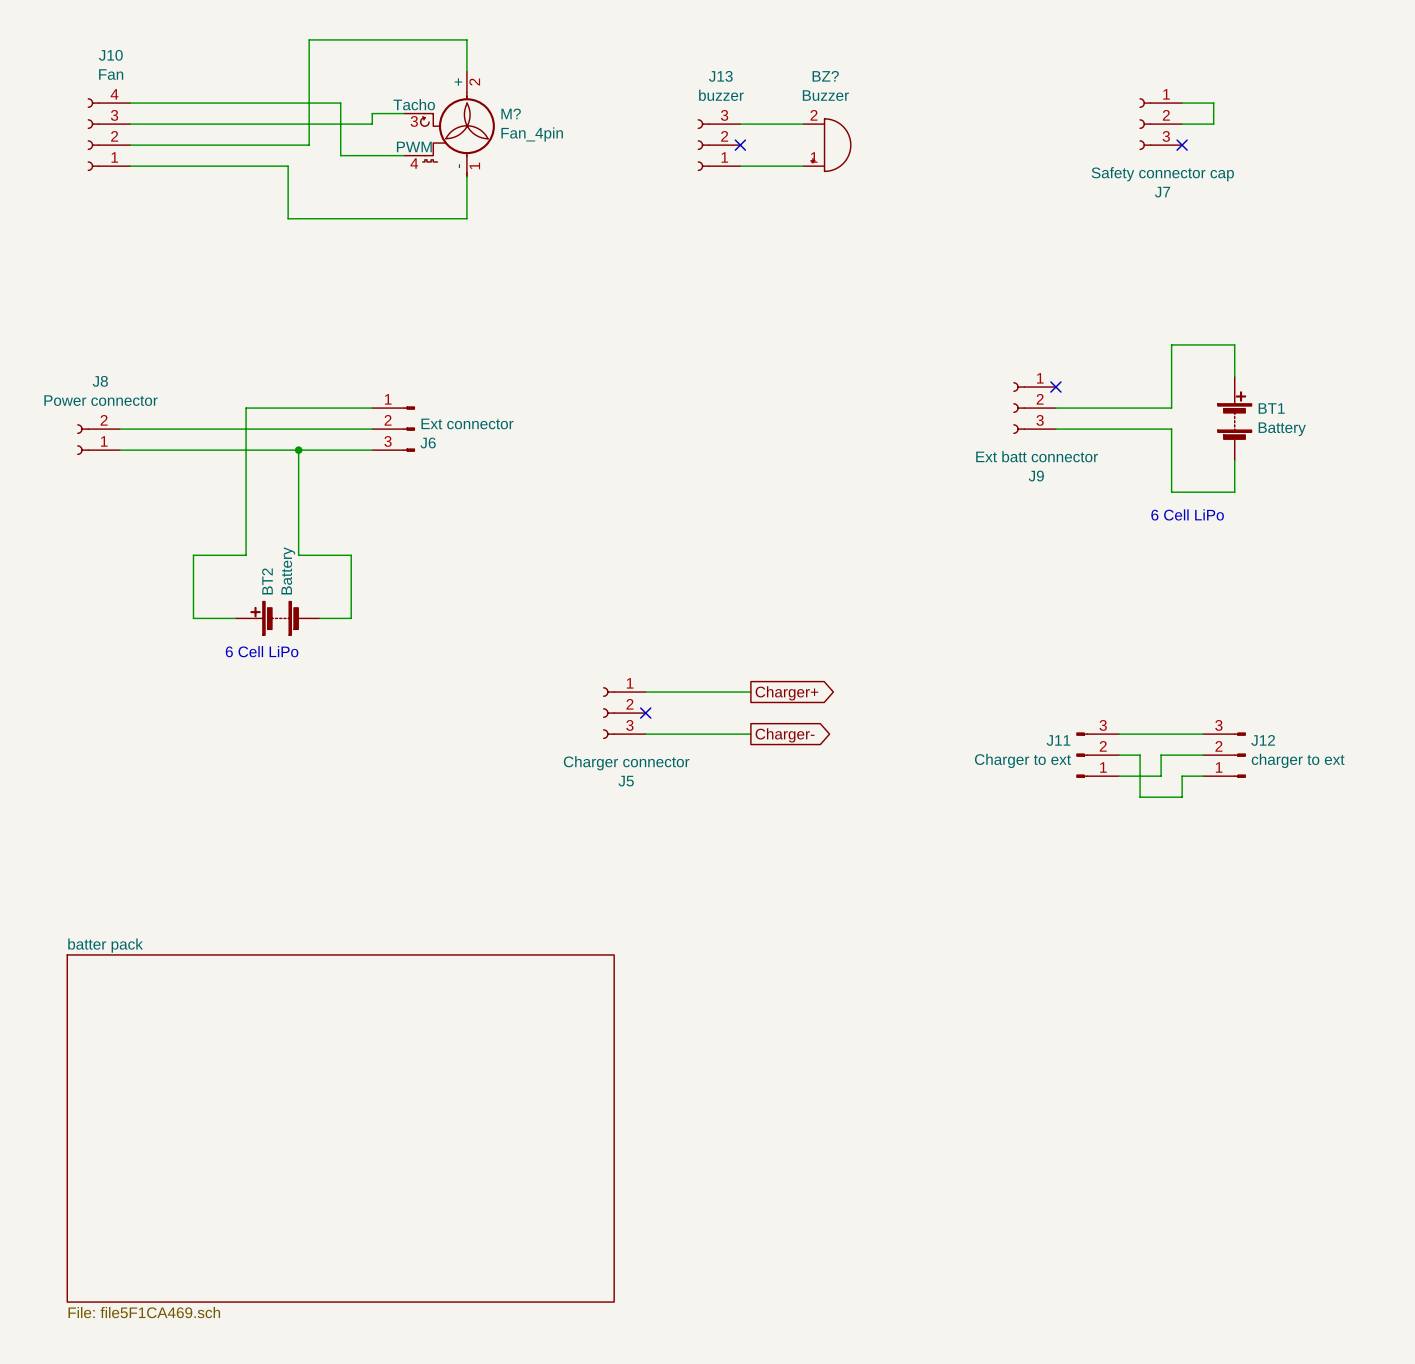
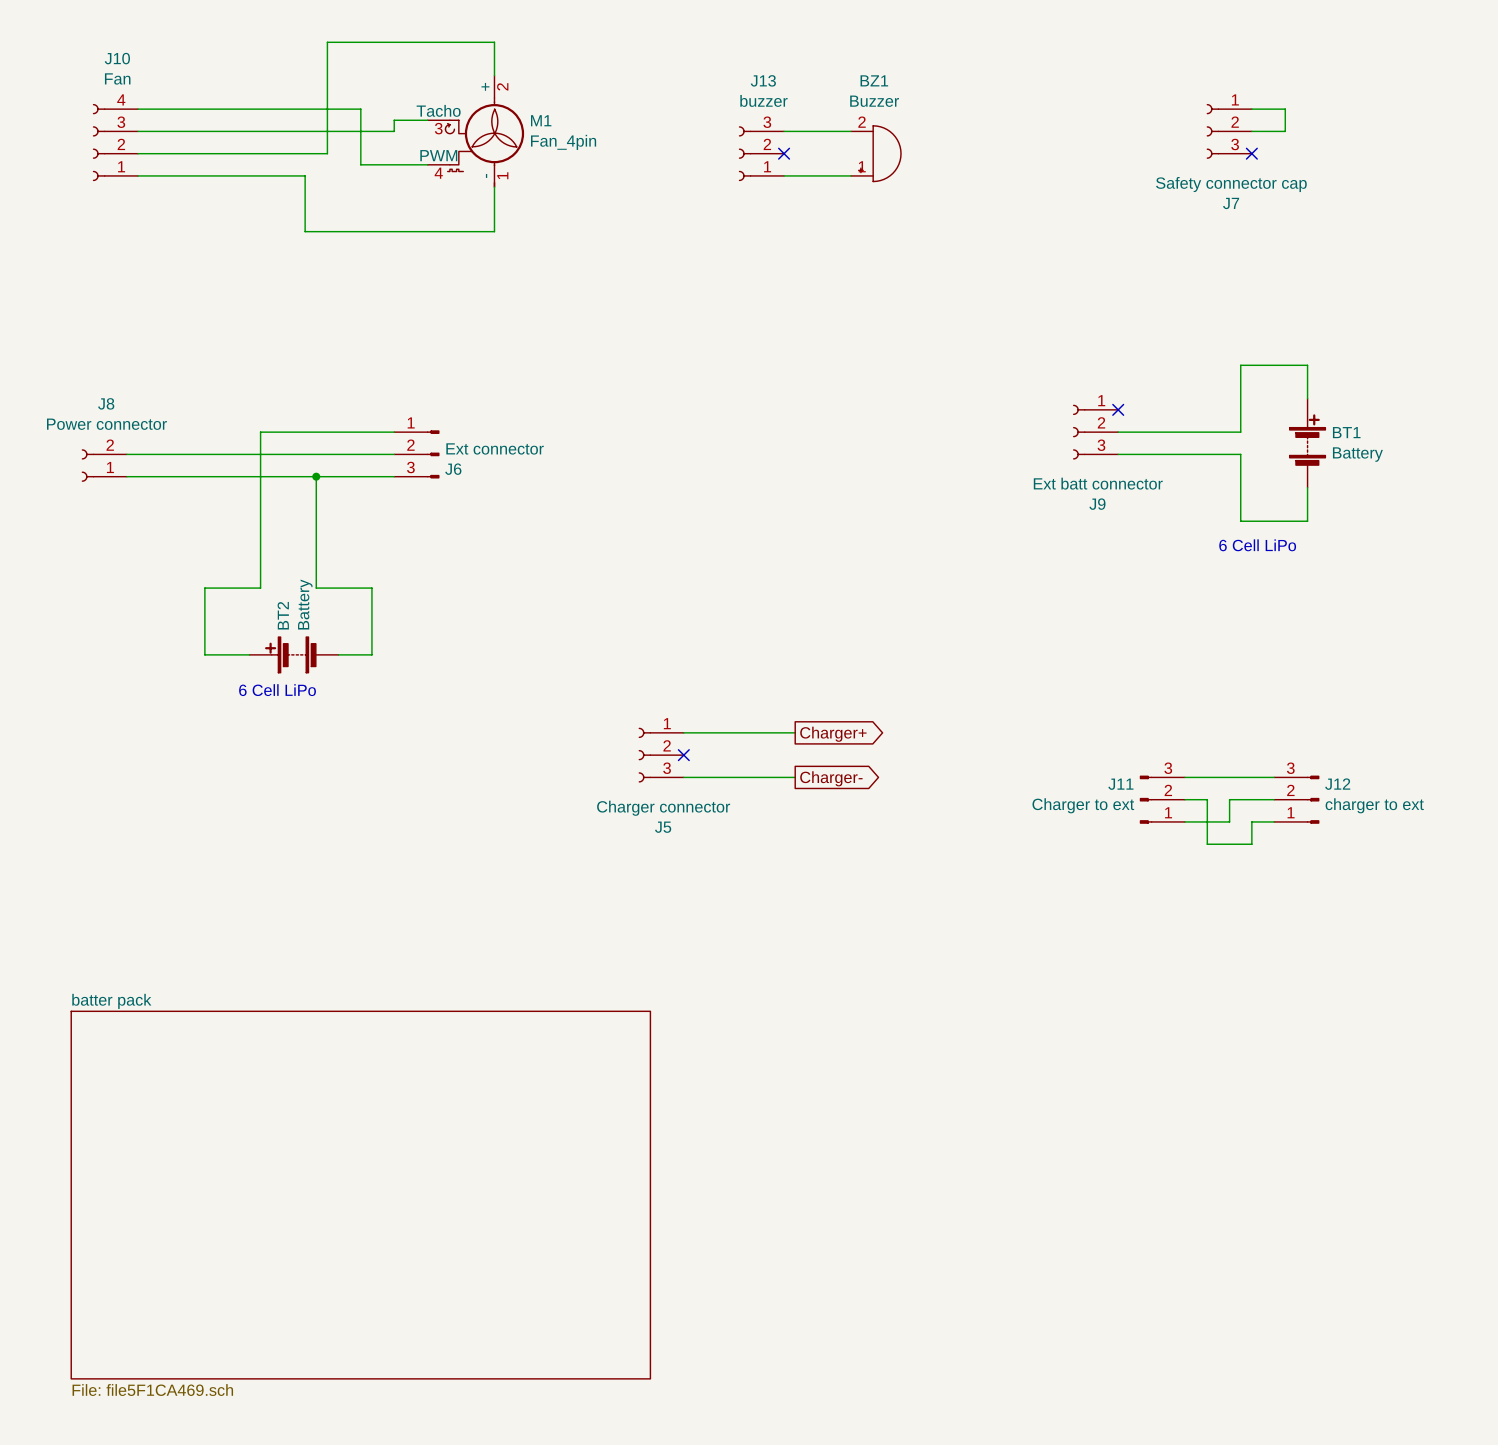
BZ? name: BZ? (825, 76) -> BZ1 (874, 80)
M? name: M? (511, 113) -> M1 (541, 120)

